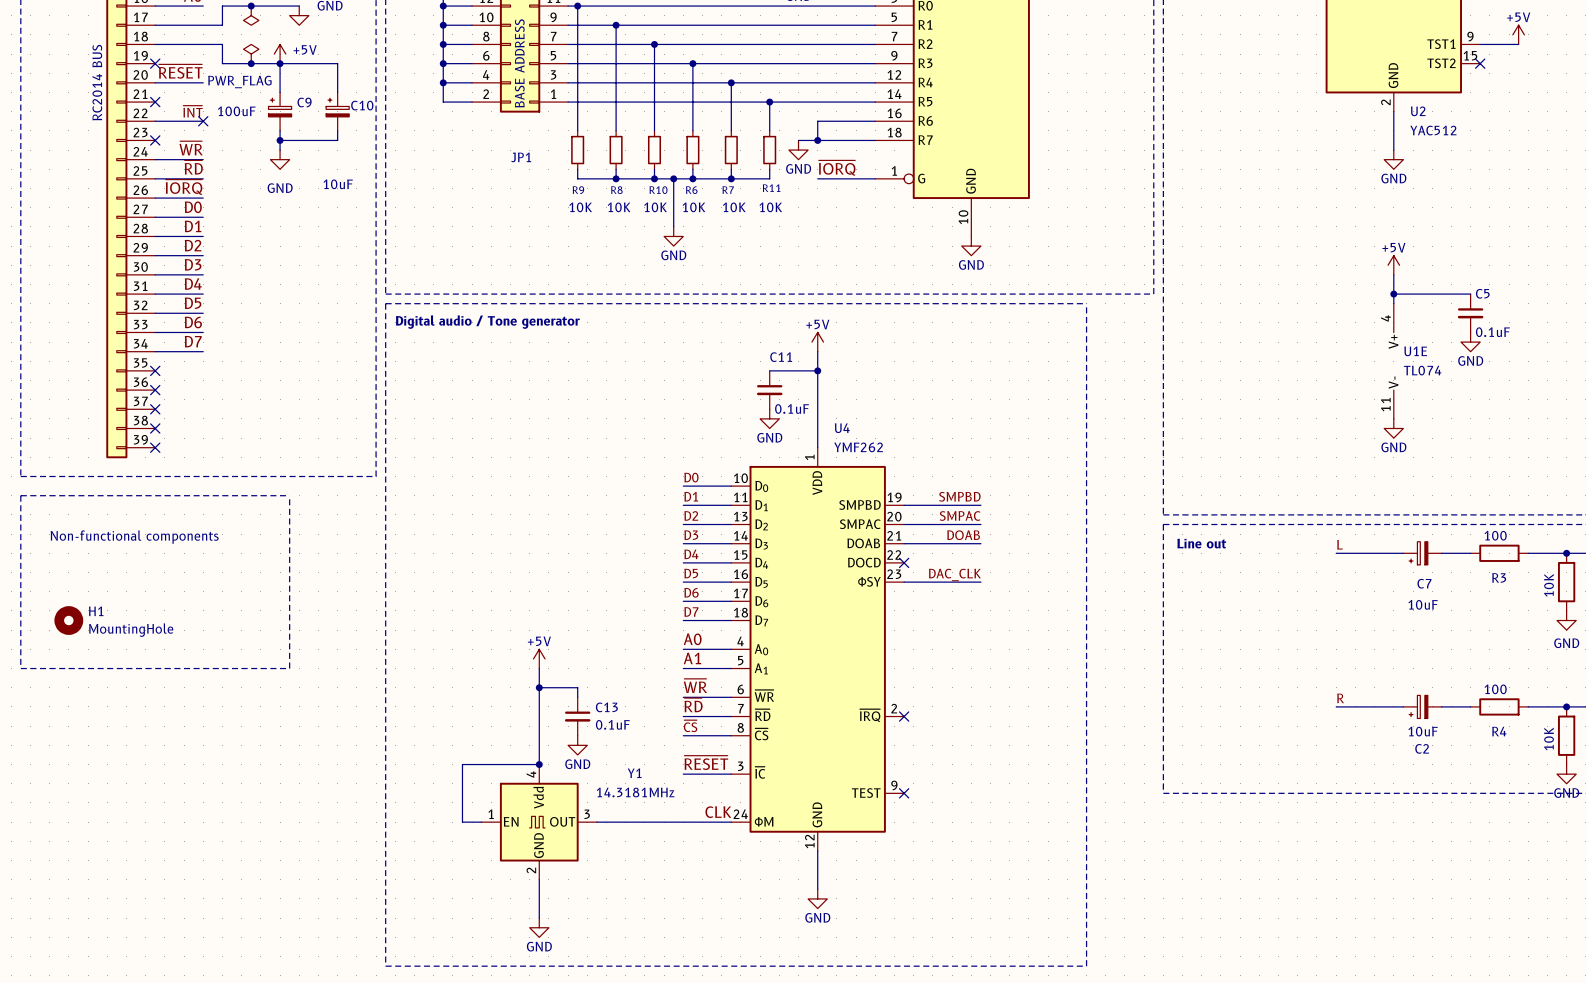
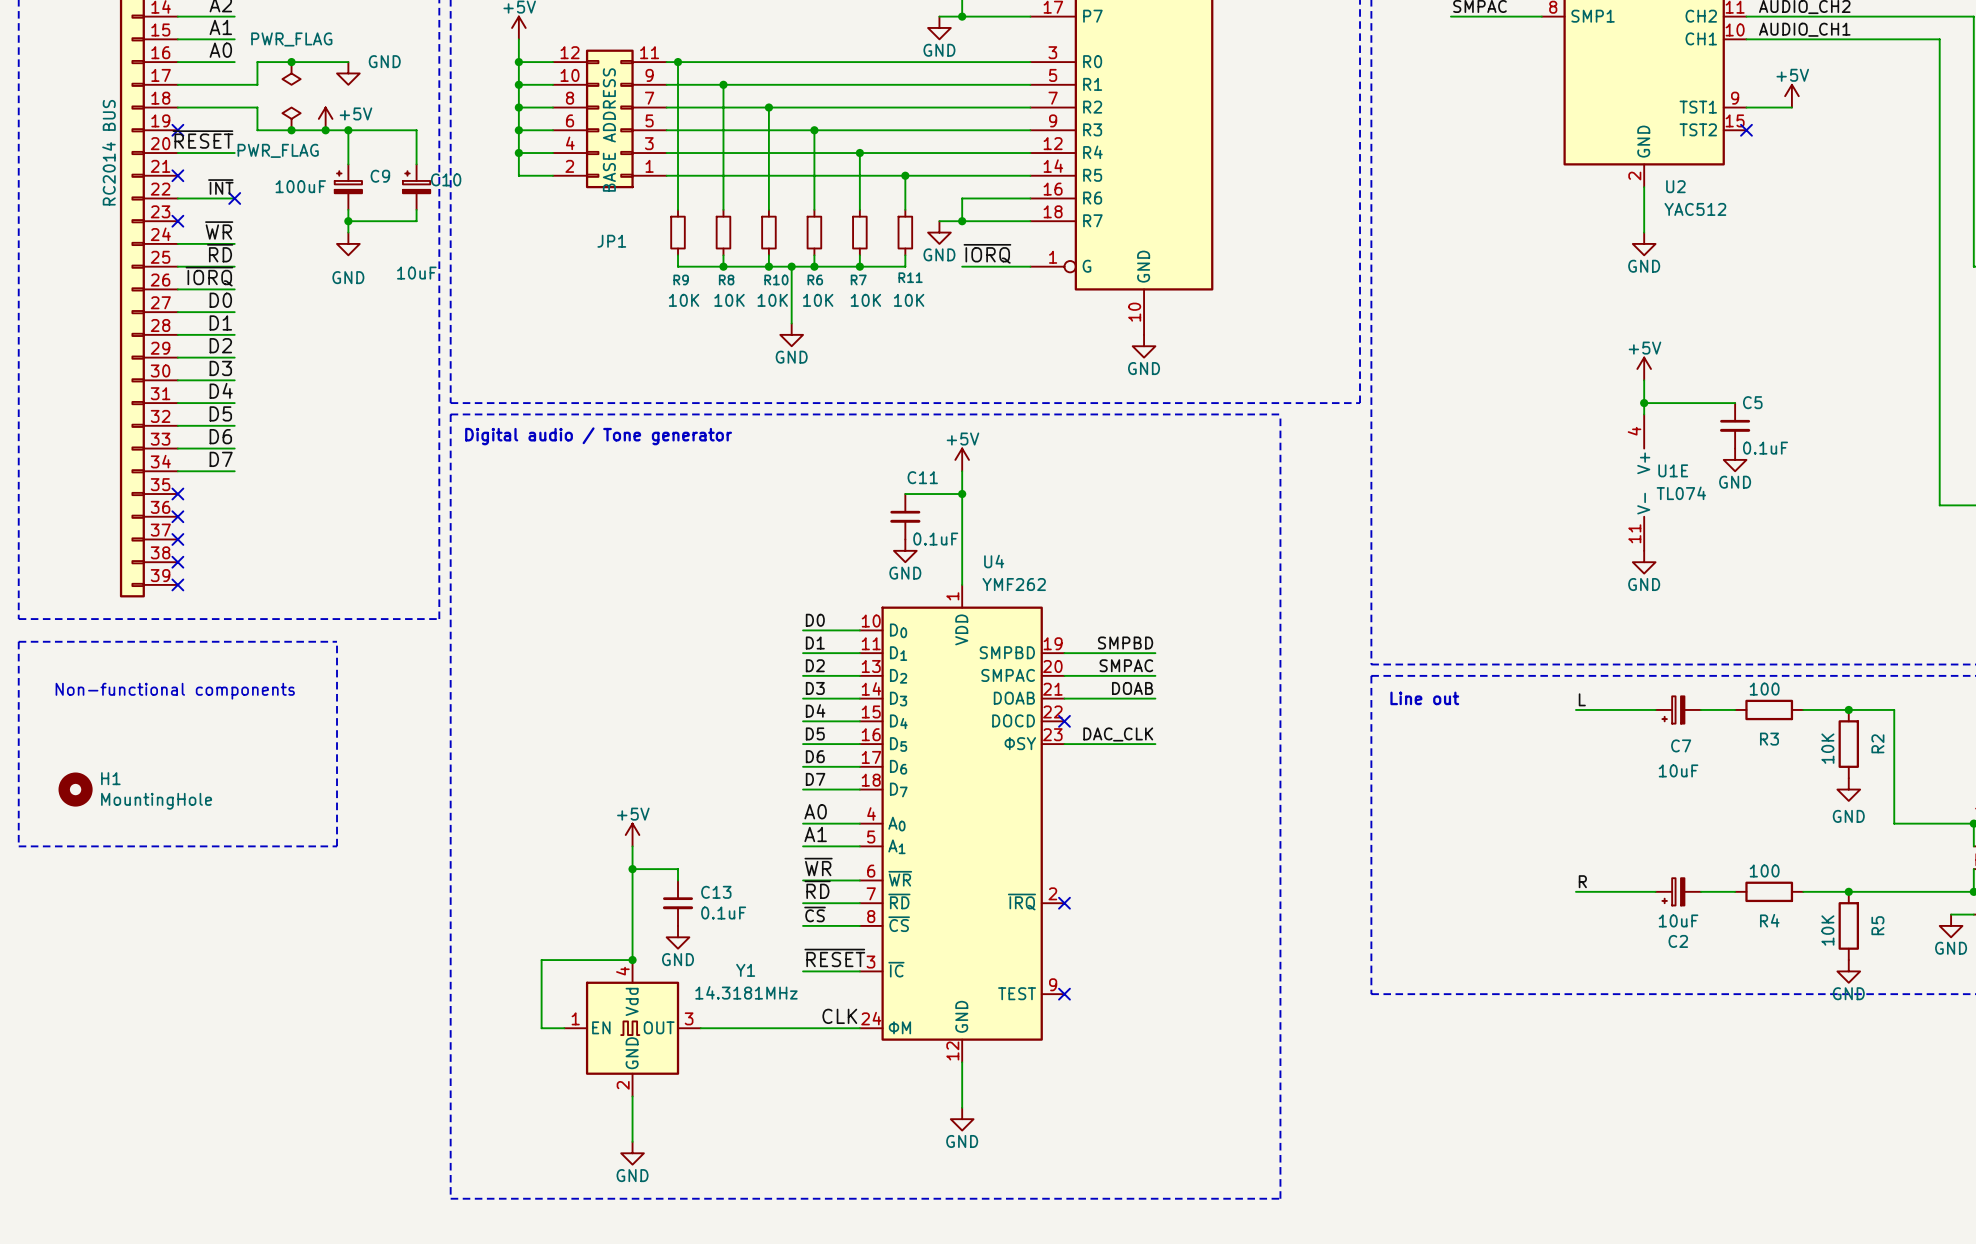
wire: (280, 63) (280, 92) -> (348, 130) (348, 164)
junction: none -> (348, 130)
wire: (337, 63) (337, 92) -> (393, 130) (416, 130) (416, 164)
C9 position: (280, 111) -> (348, 187)
C10 position: (337, 111) -> (416, 187)
wire: (280, 130) (280, 150) -> (348, 209) (348, 232)
wire: (337, 130) (337, 140) -> (416, 209) (416, 221) (393, 221)
wire: (280, 140) (299, 140) -> none
junction position: (280, 140) -> (348, 221)
power symbol position: GND (280, 159) -> GND (348, 243)

